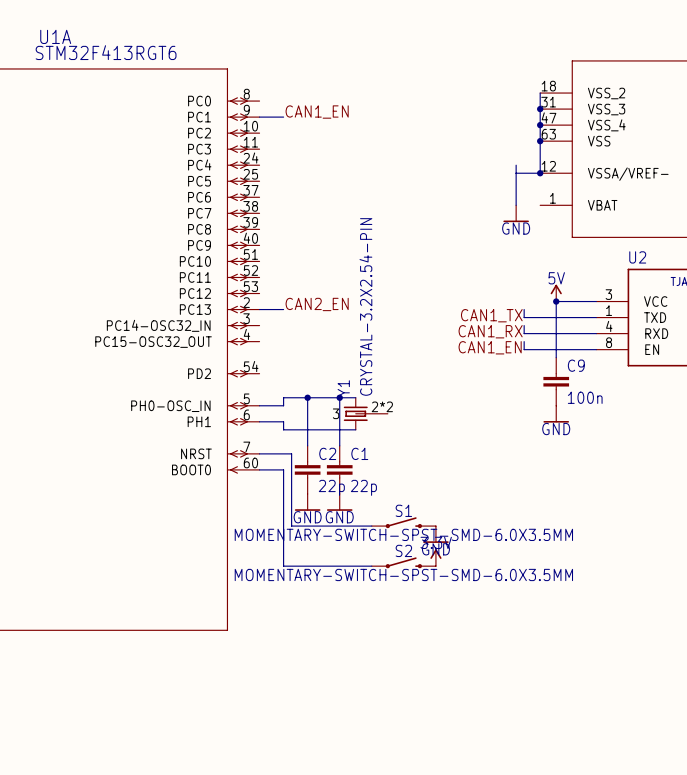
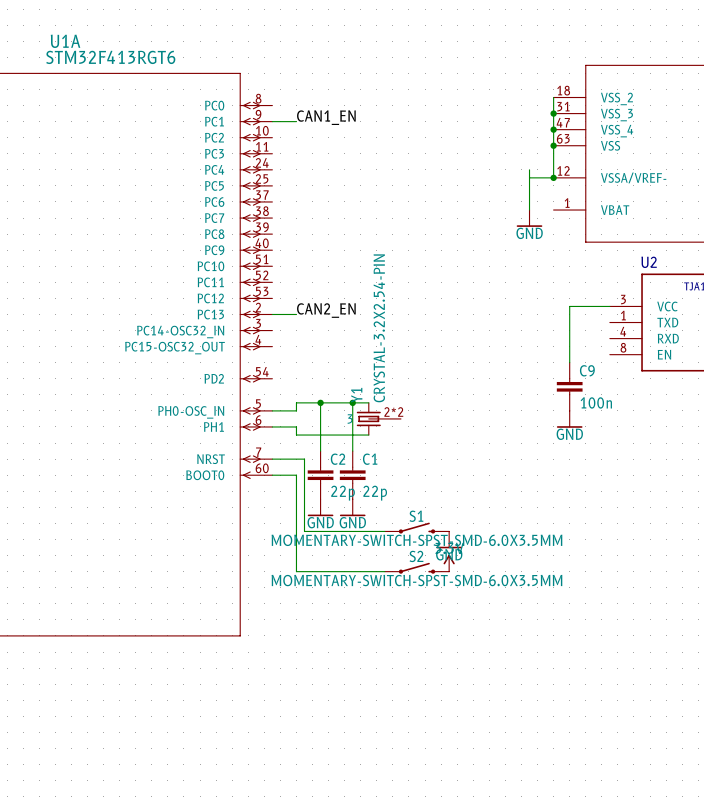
power symbol: 5V (556, 293) -> none
junction: (556, 301) -> none
wire: (524, 309) (524, 317) (596, 317) -> none
label: CAN1_TX (491, 315) -> none
wire: (524, 325) (524, 333) (596, 333) -> none
label: CAN1_RX (490, 331) -> none
wire: (524, 341) (524, 349) (596, 349) -> none
label: CAN1_EN (490, 347) -> none

